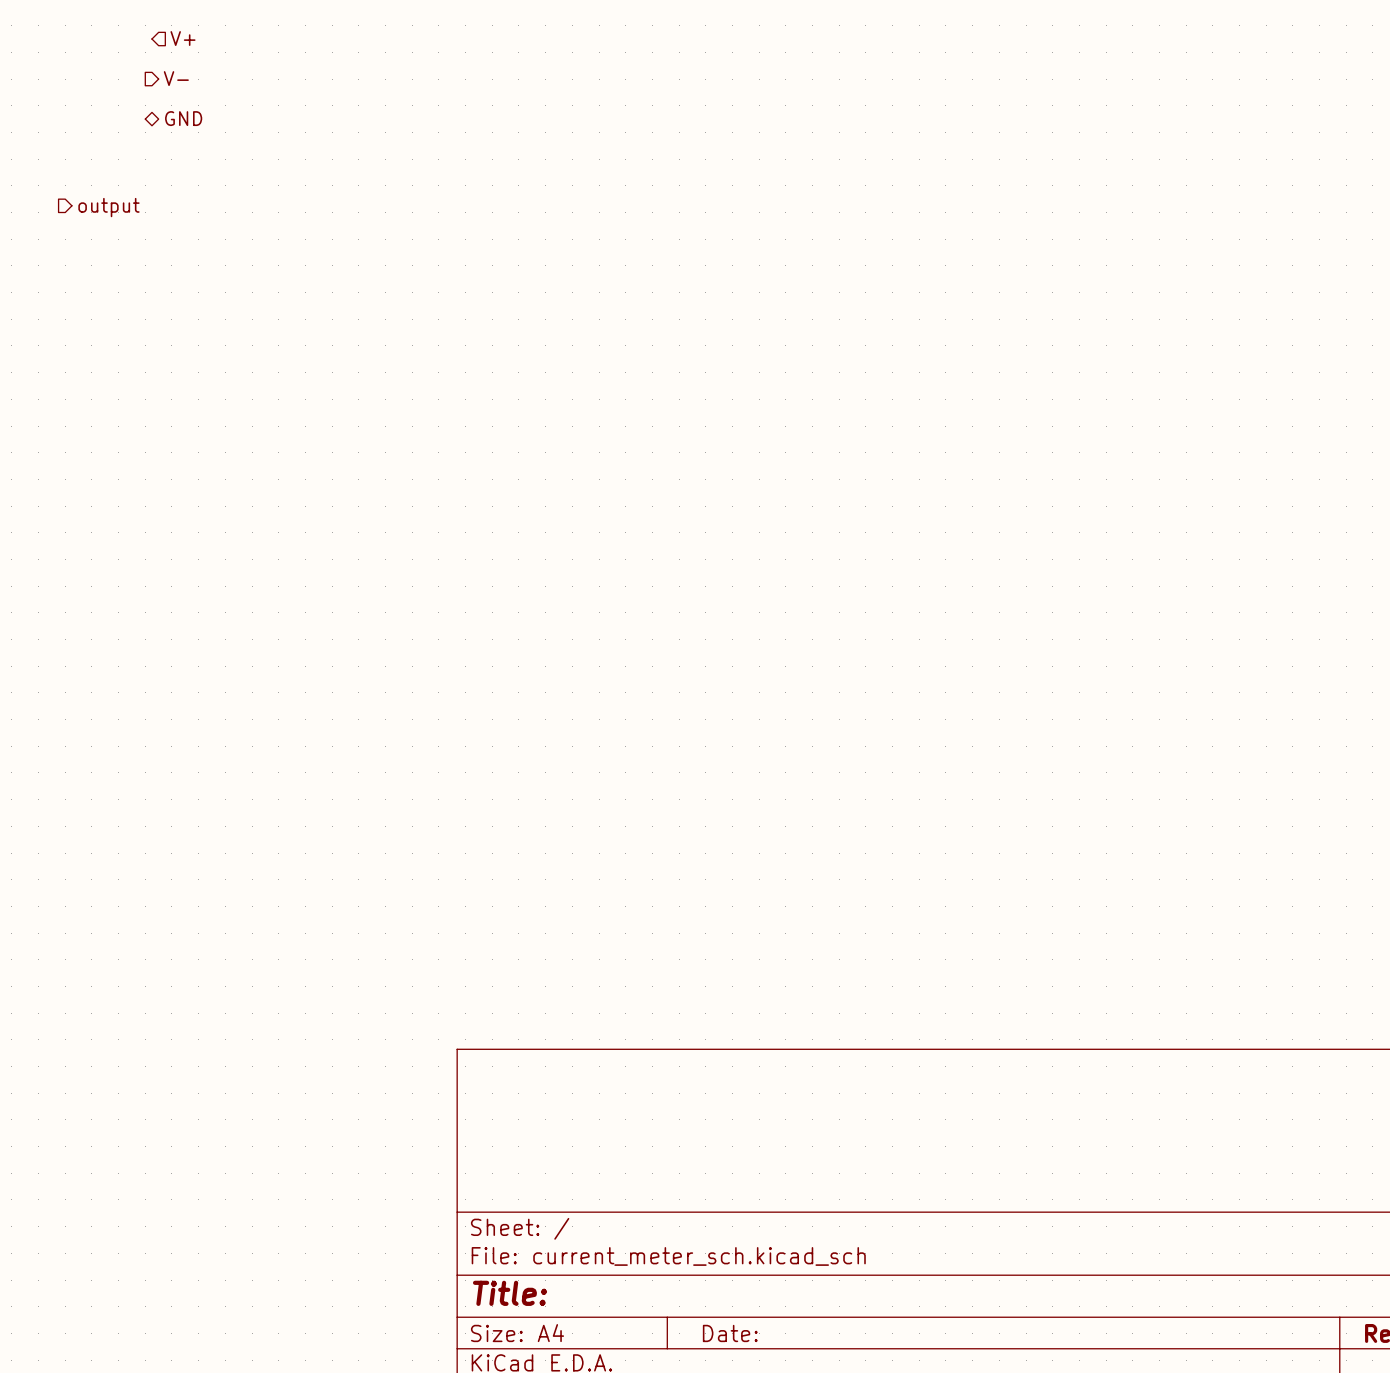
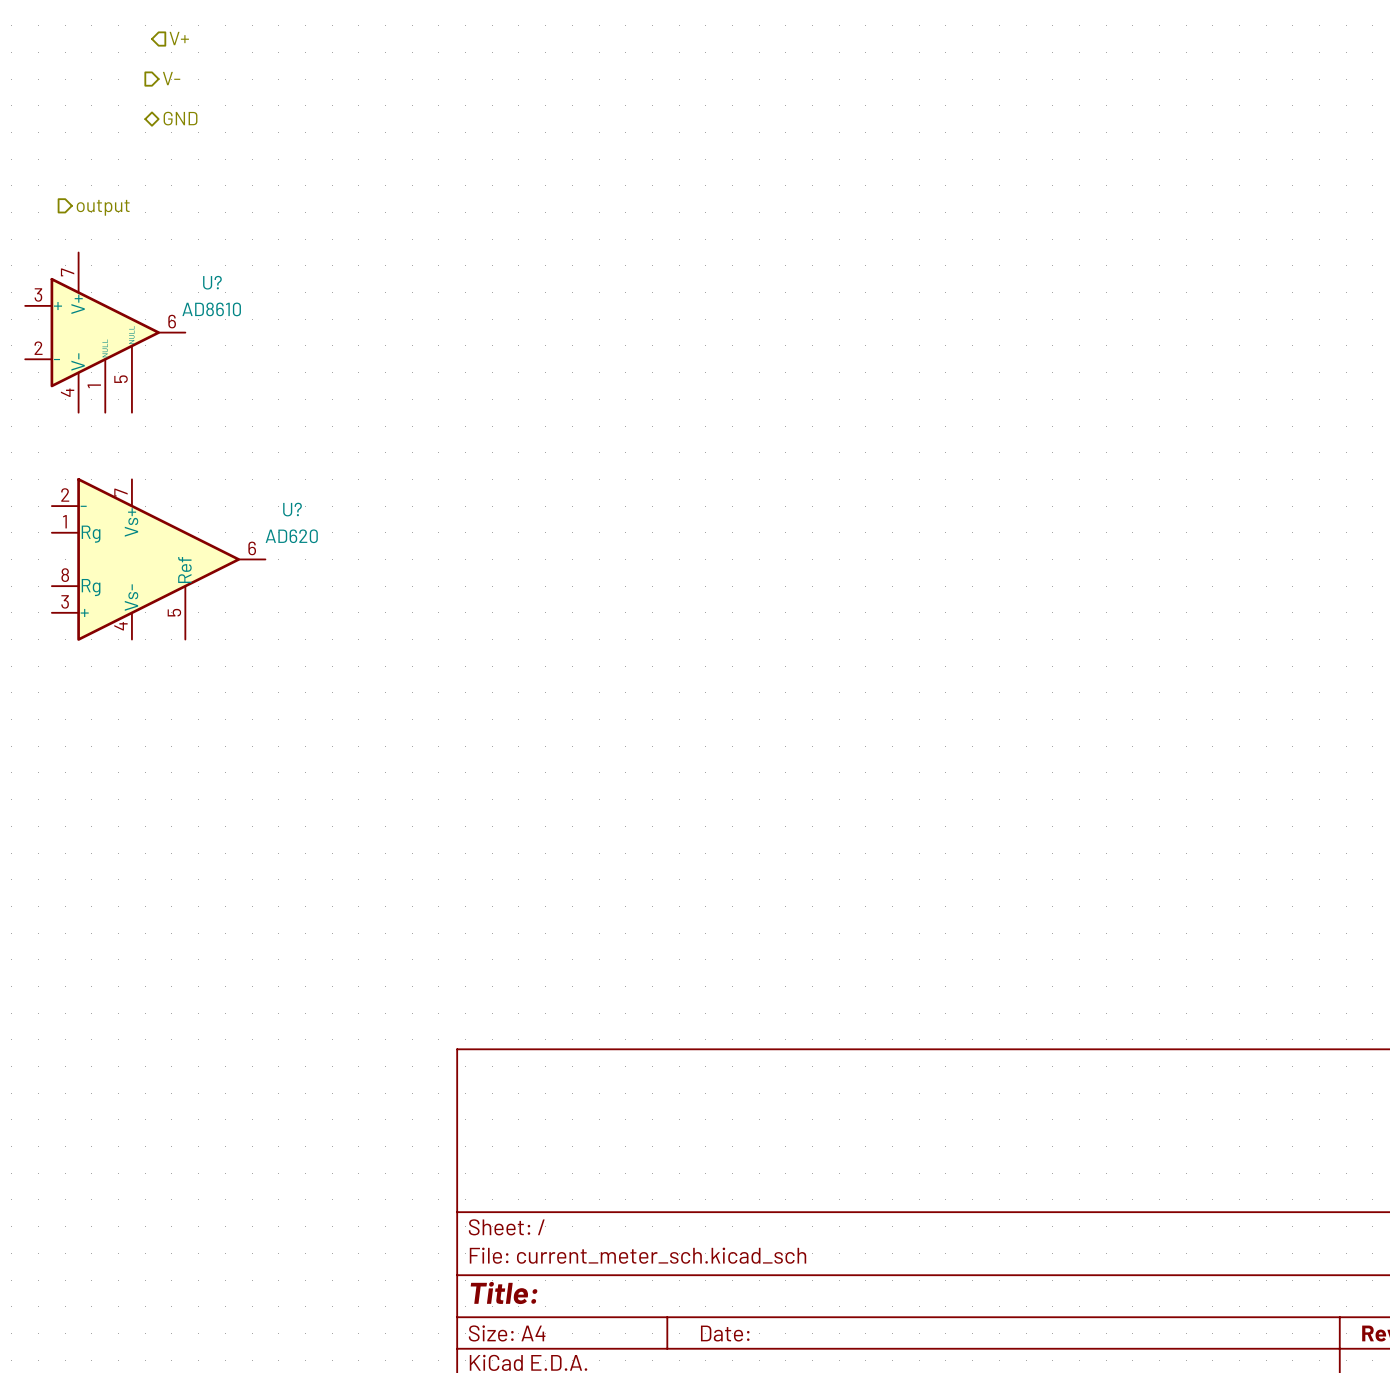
U?: none -> AD8610 (105, 332)
U?: none -> AD620 (158, 559)

